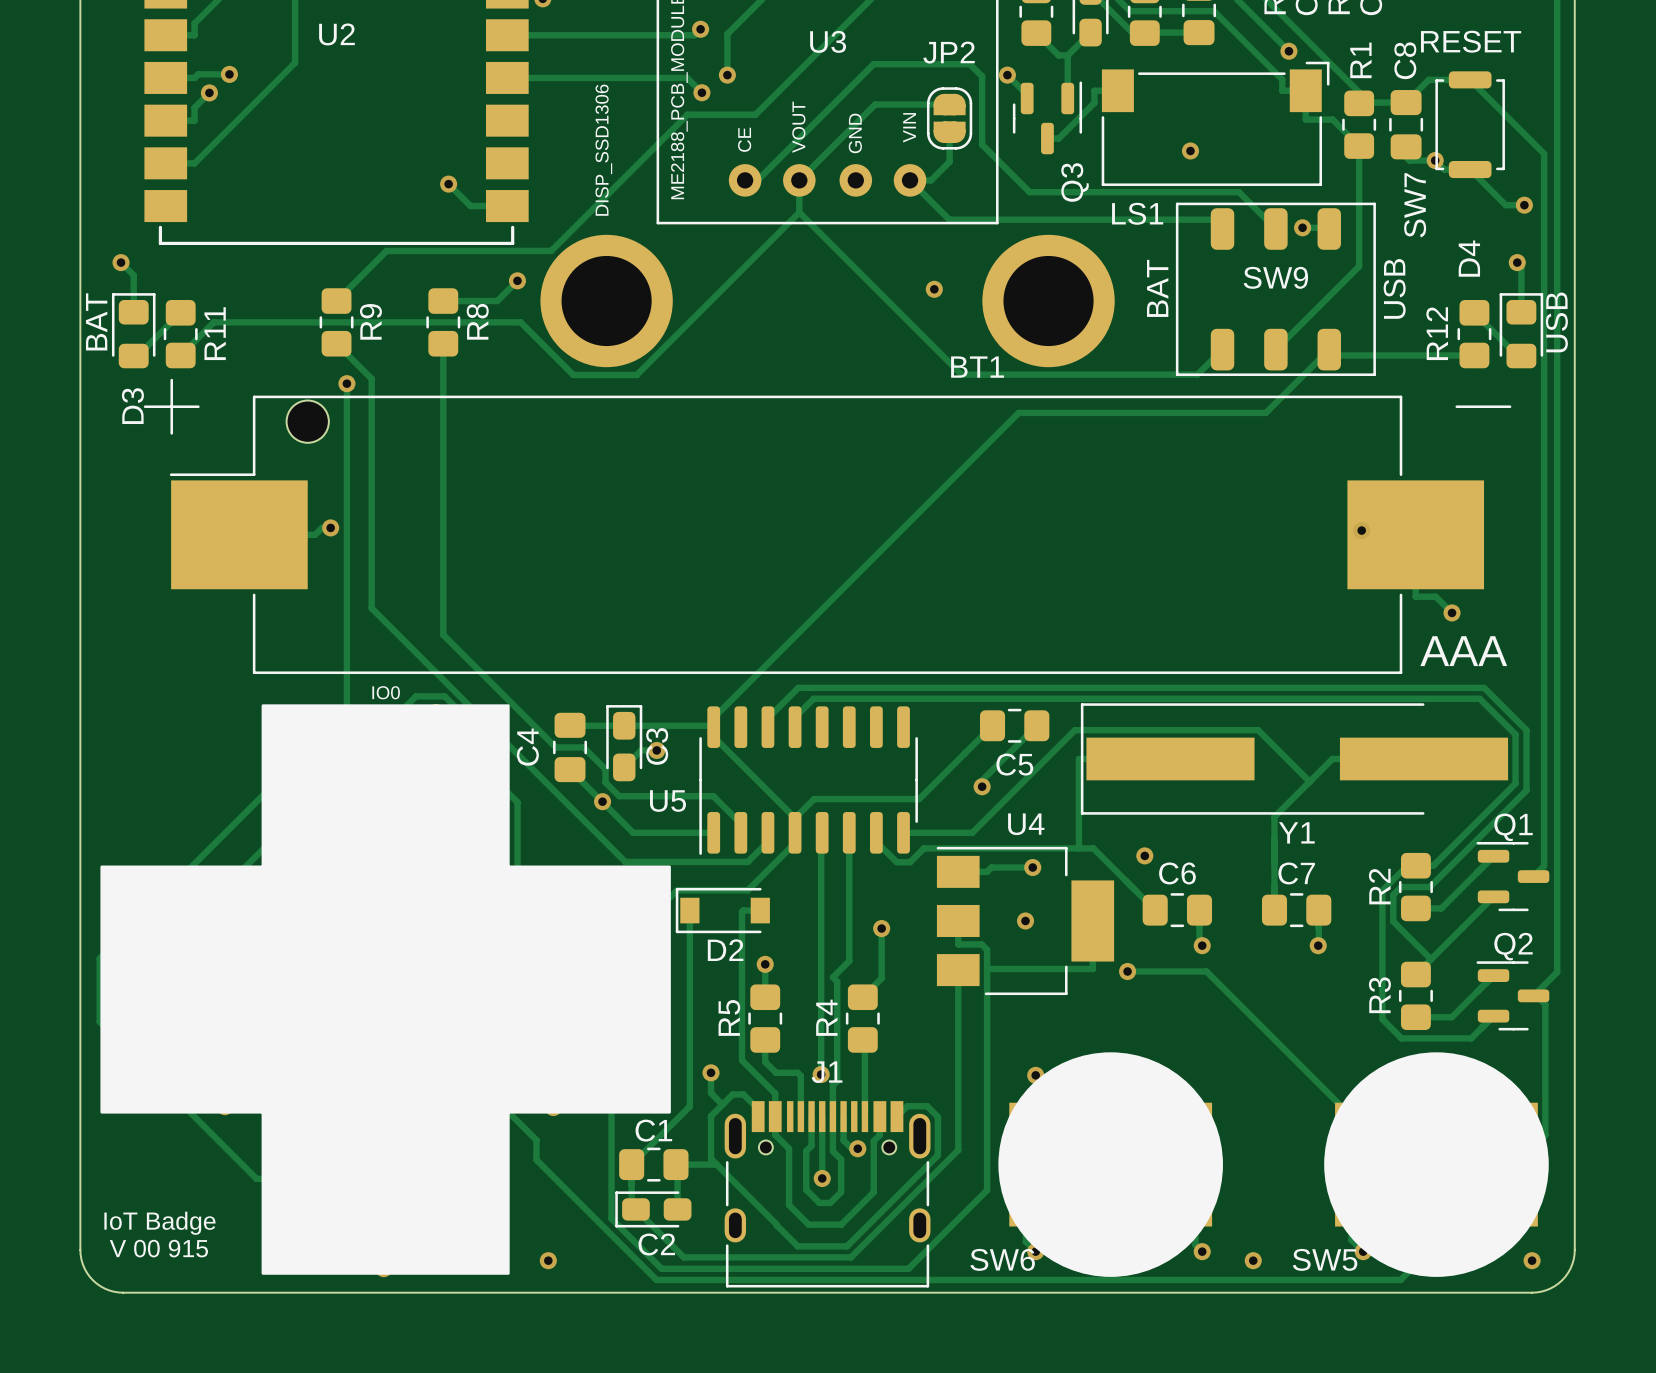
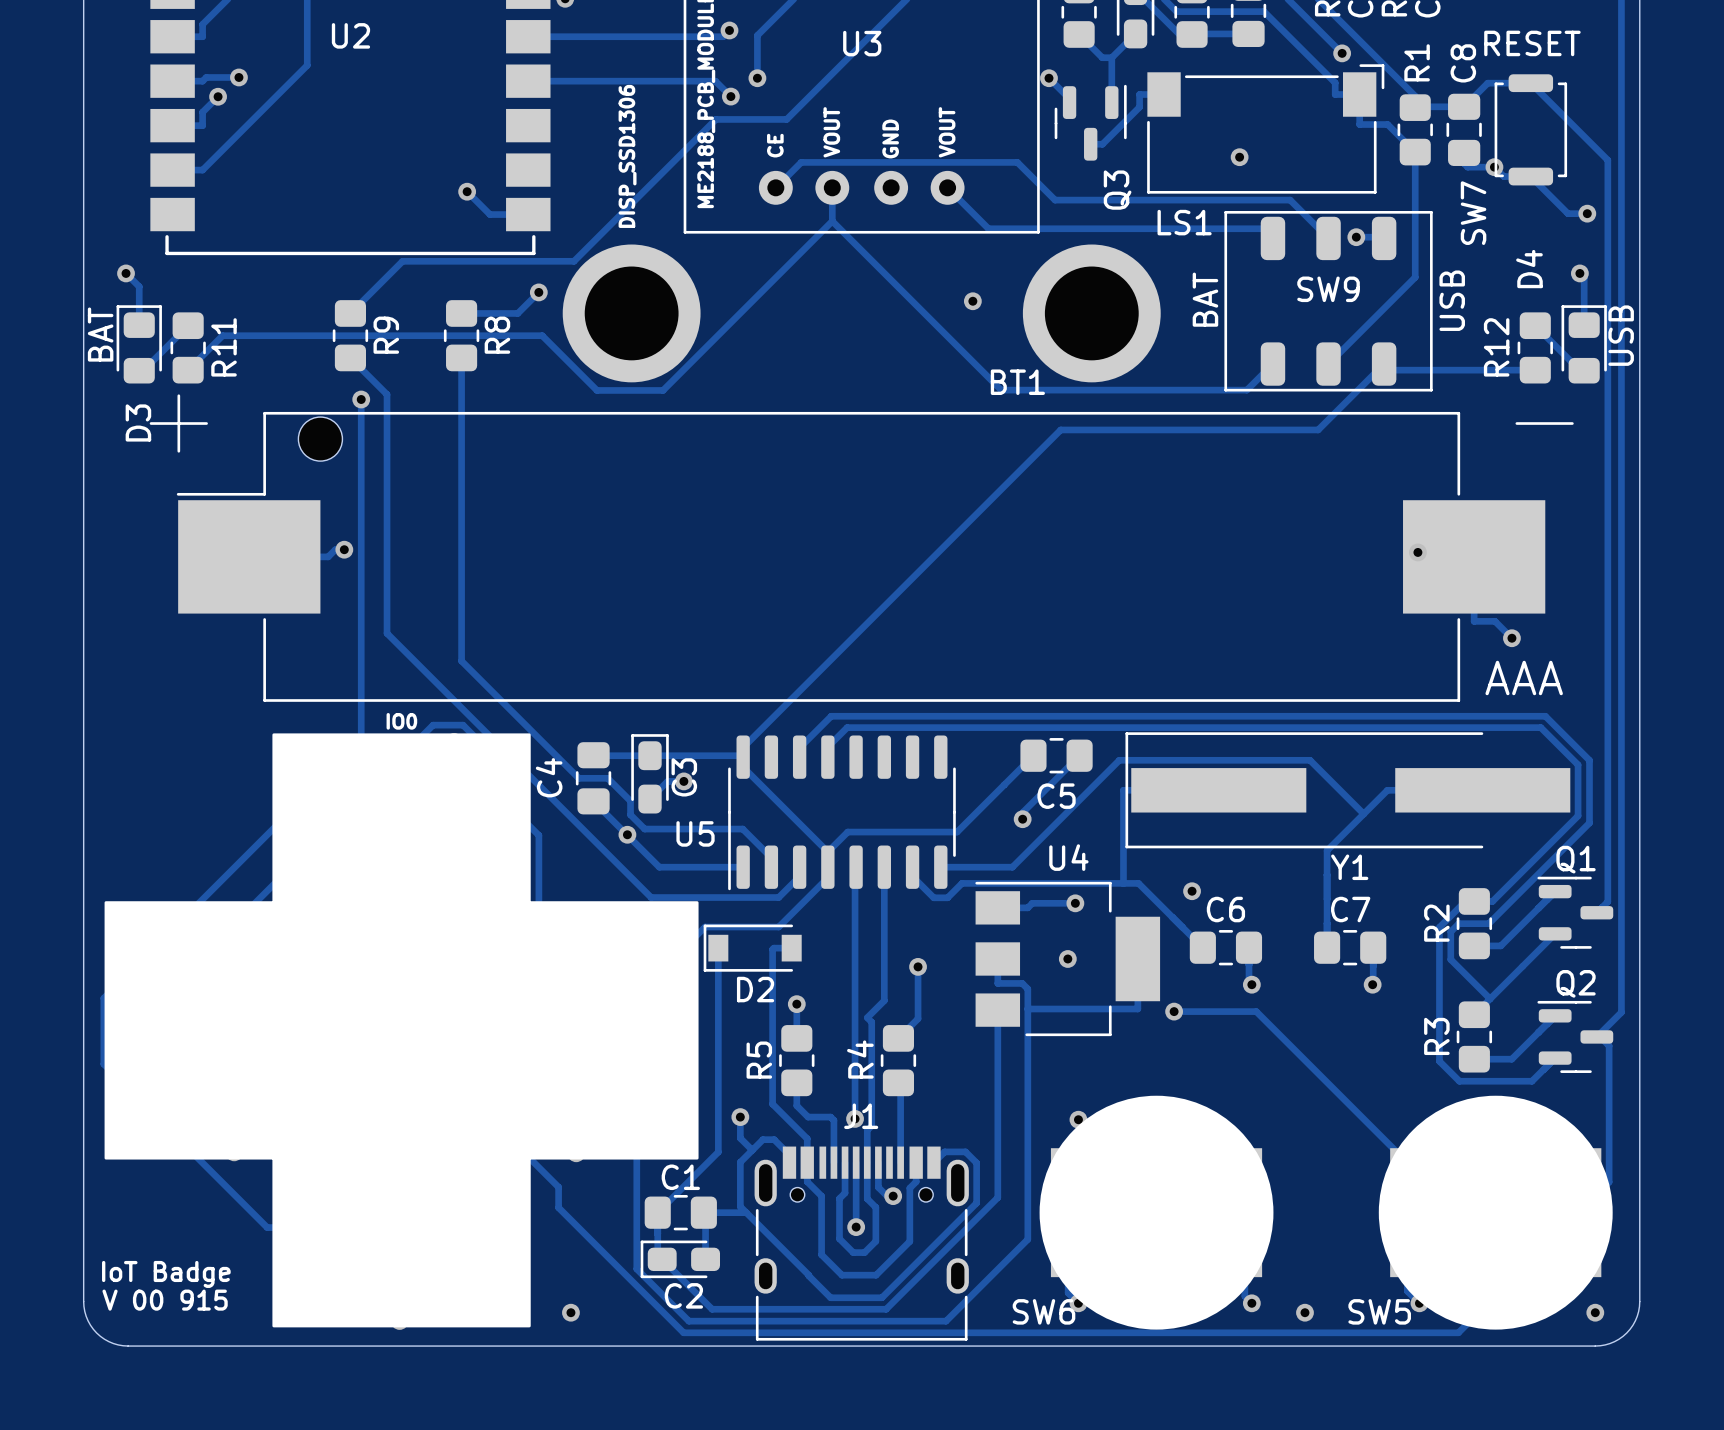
track: (949, 104) (875, 104) (799, 180) -> none
JP2: (949, 118) -> none
text: VIN (909, 127) -> VOUT (947, 132)
track: (949, 132) (949, 161) (931, 180) (910, 180) -> none
track: (745, 180) (757, 180) (873, 64) (969, 64) (982, 76) (982, 144) (1029, 192) -> (775, 187) (801, 162) (1017, 162) (1055, 200) (1072, 200)

